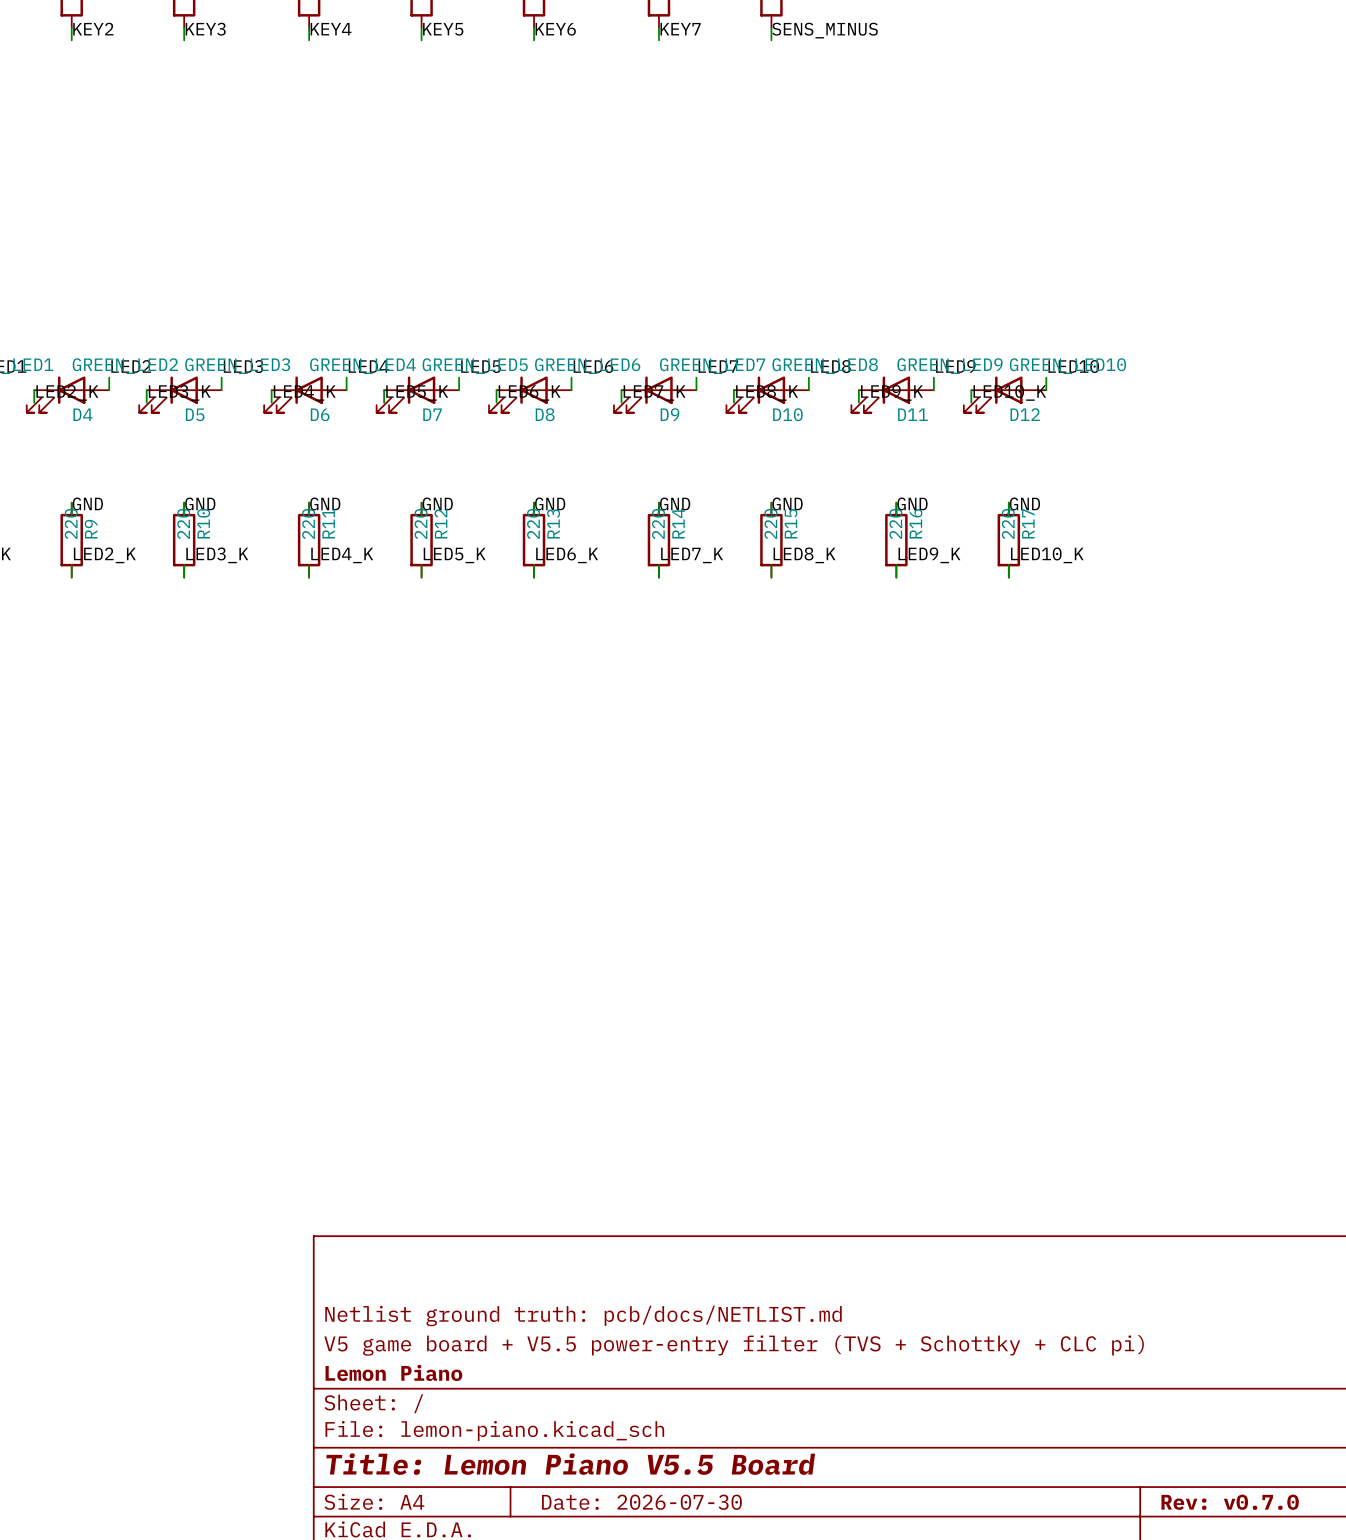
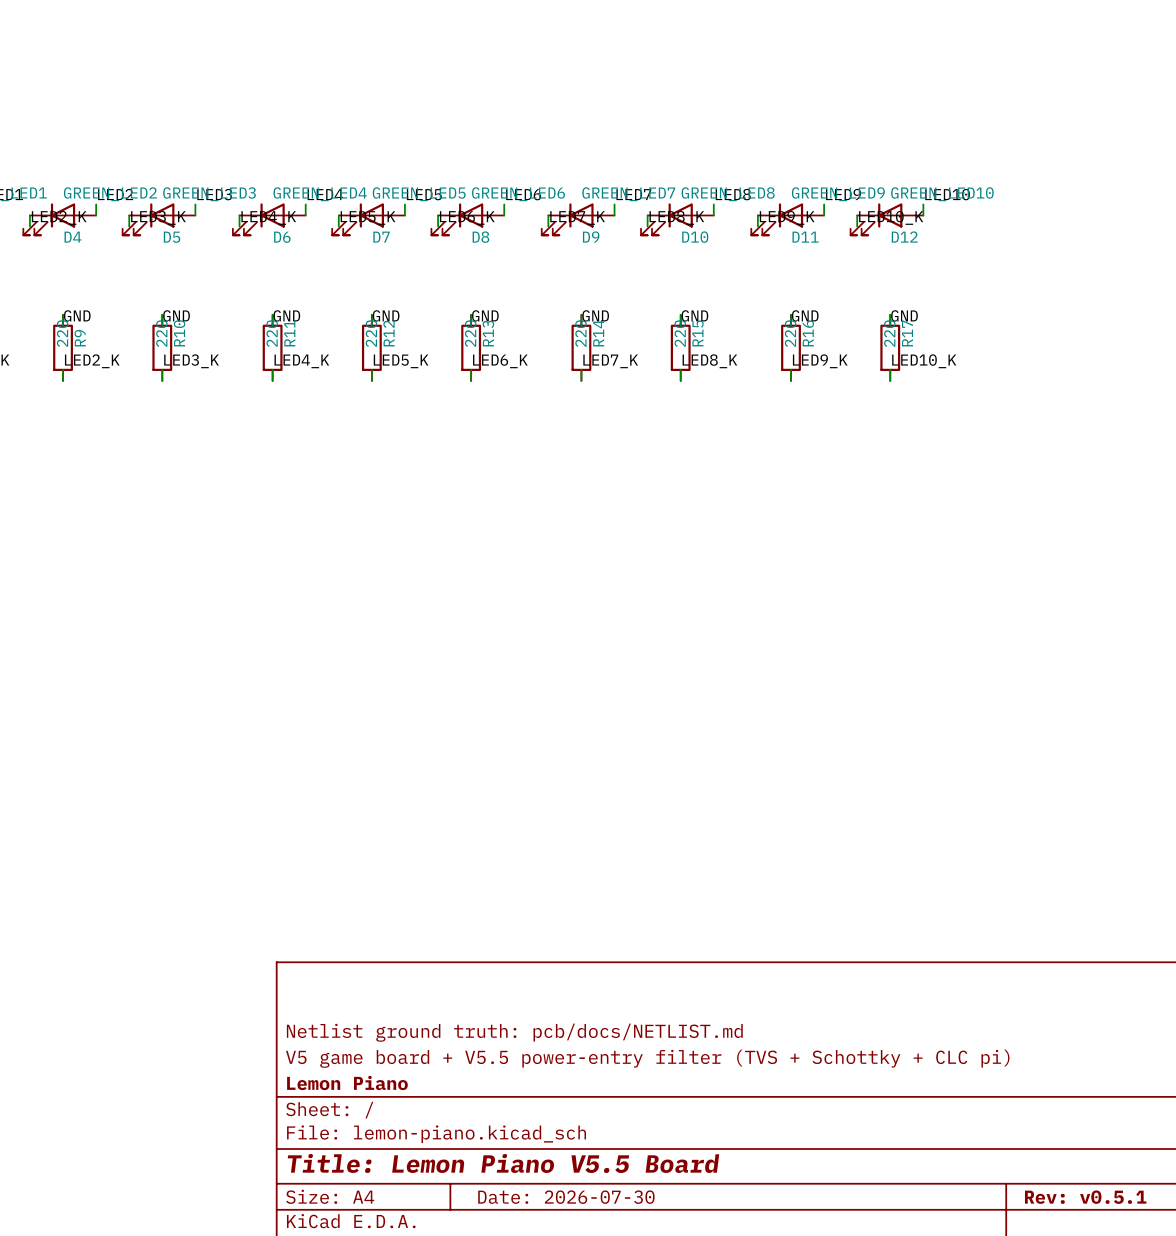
title block: Rev: v0.7.0 (1230, 1502) -> Rev: v0.5.1 (1085, 1197)

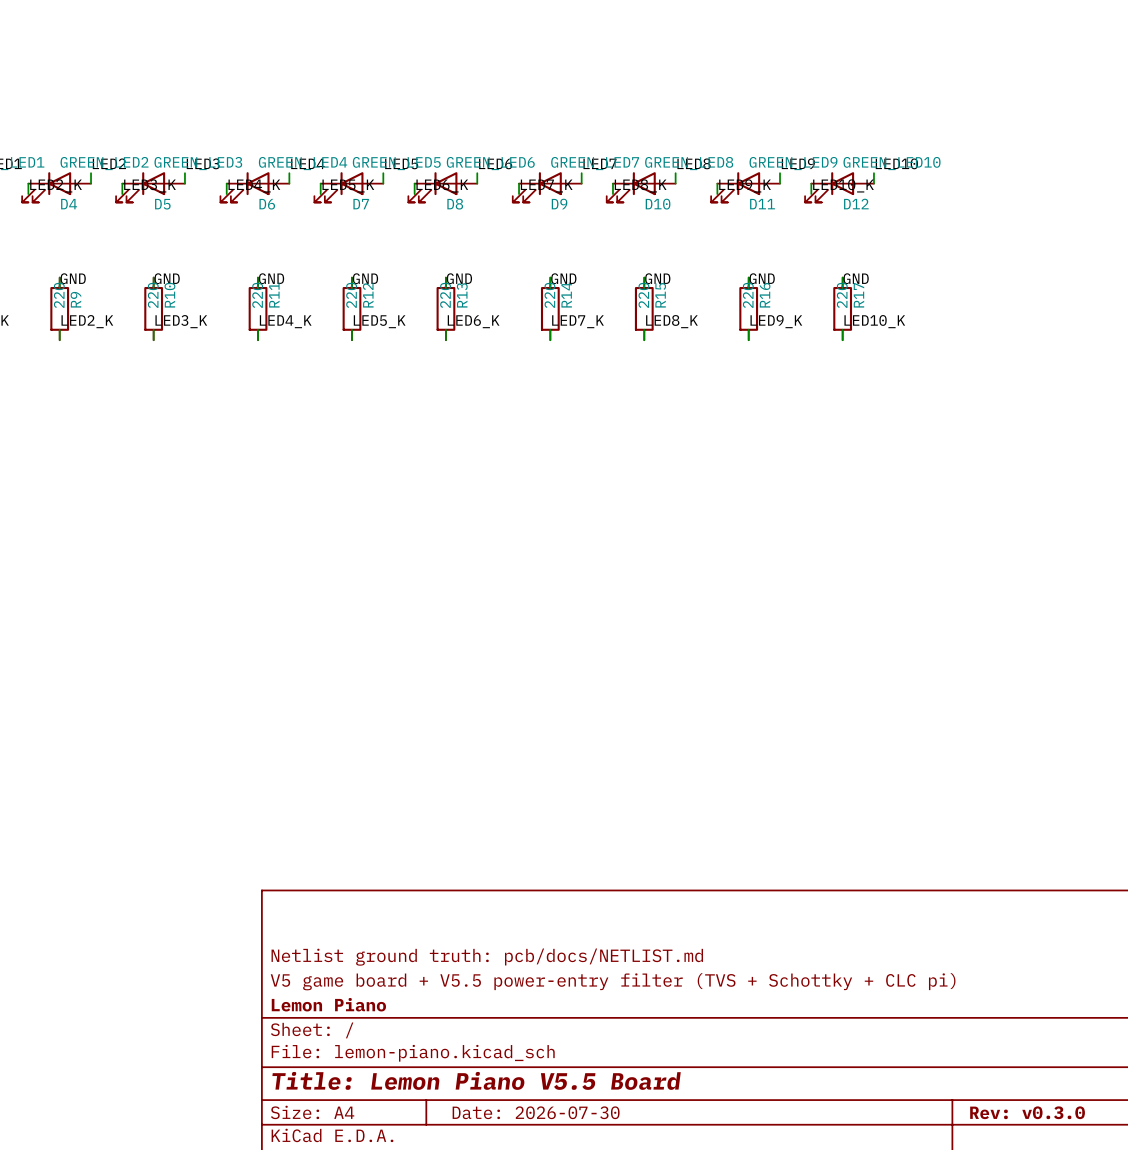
title block: Rev: v0.5.1 (1085, 1197) -> Rev: v0.3.0 (1027, 1112)

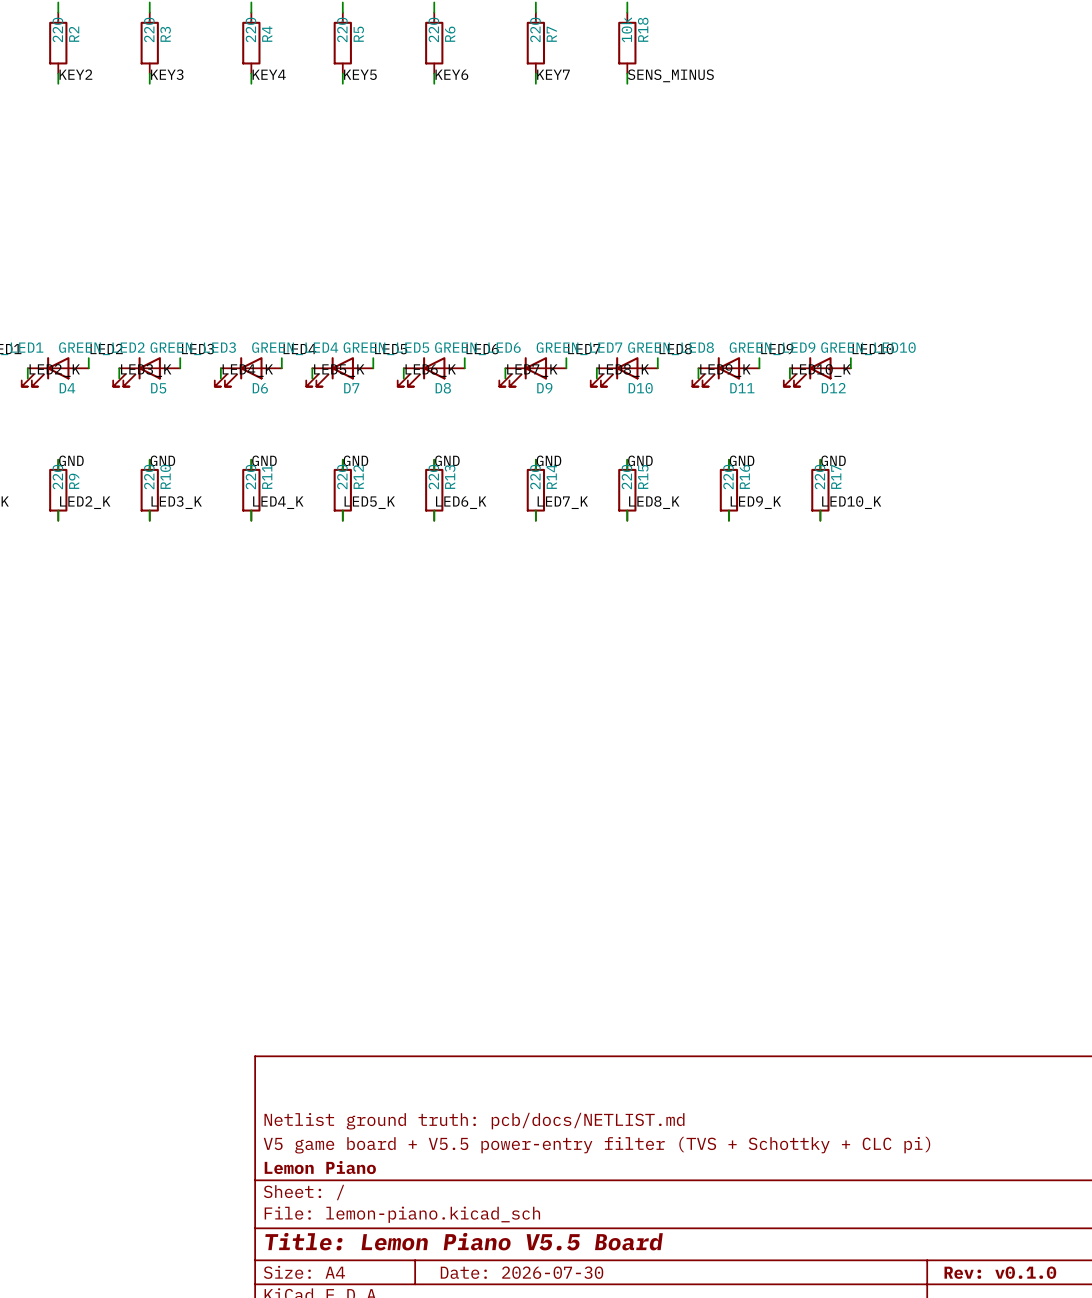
title block: Rev: v0.3.0 (1027, 1112) -> Rev: v0.1.0 (1000, 1272)

